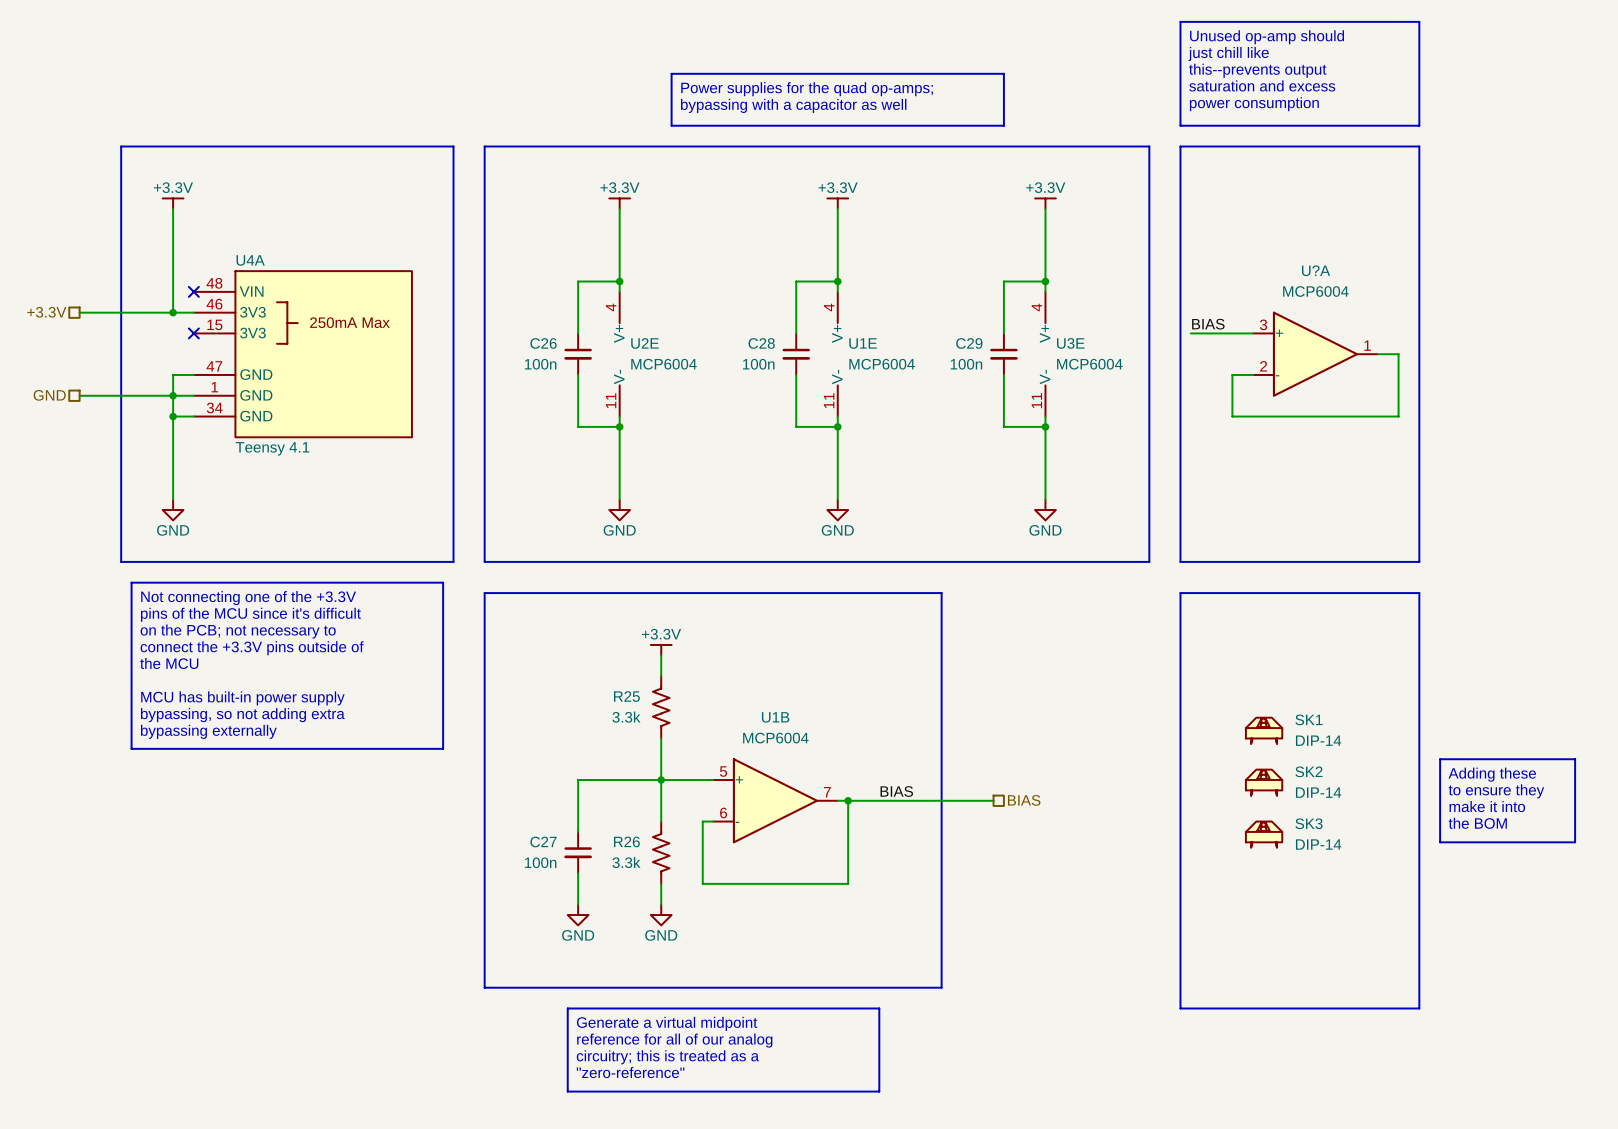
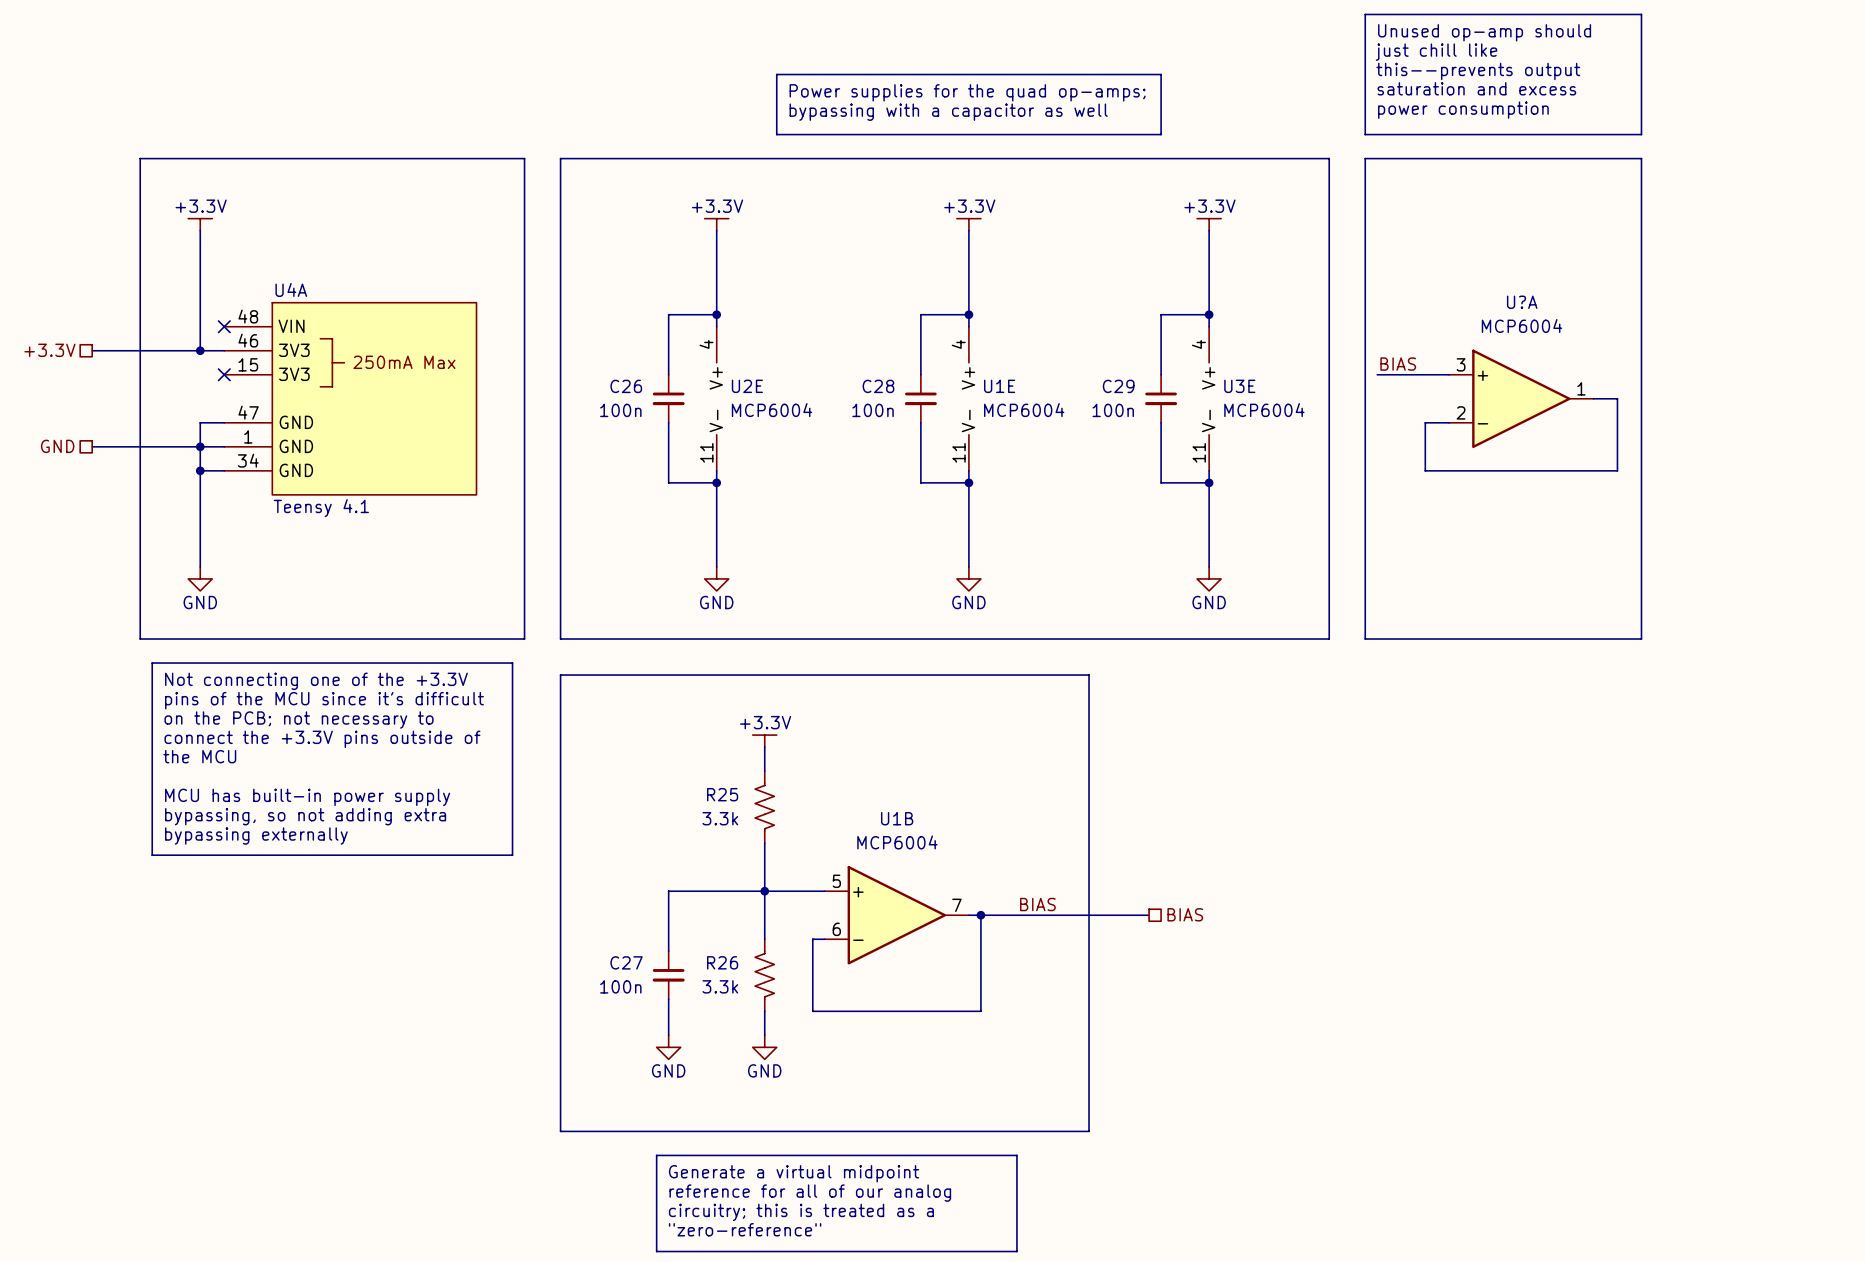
line: (1180, 593) (1419, 593) (1419, 1008) (1180, 1008) (1180, 593) -> none
SK1: DIP-14 (1264, 730) -> none
line: (1440, 759) (1575, 759) (1575, 842) (1440, 842) (1440, 759) -> none
text: Adding these (1492, 774) -> none
SK2: DIP-14 (1264, 782) -> none
text: to ensure they (1496, 791) -> none
text: make it into (1487, 806) -> none
text: the BOM (1477, 823) -> none
SK3: DIP-14 (1264, 834) -> none

